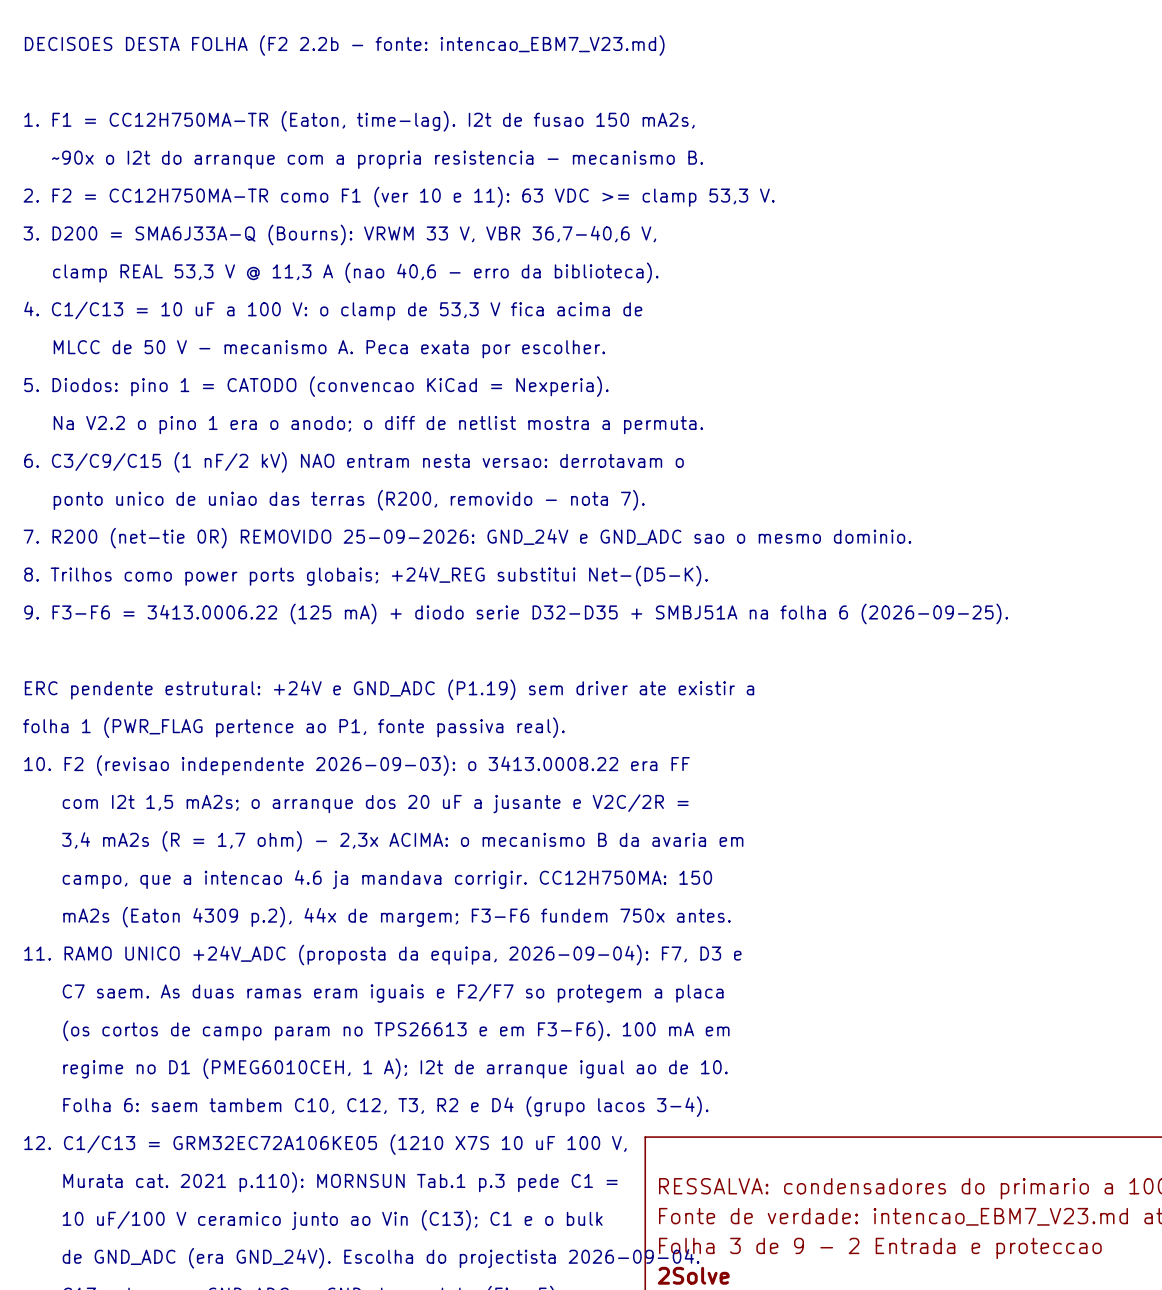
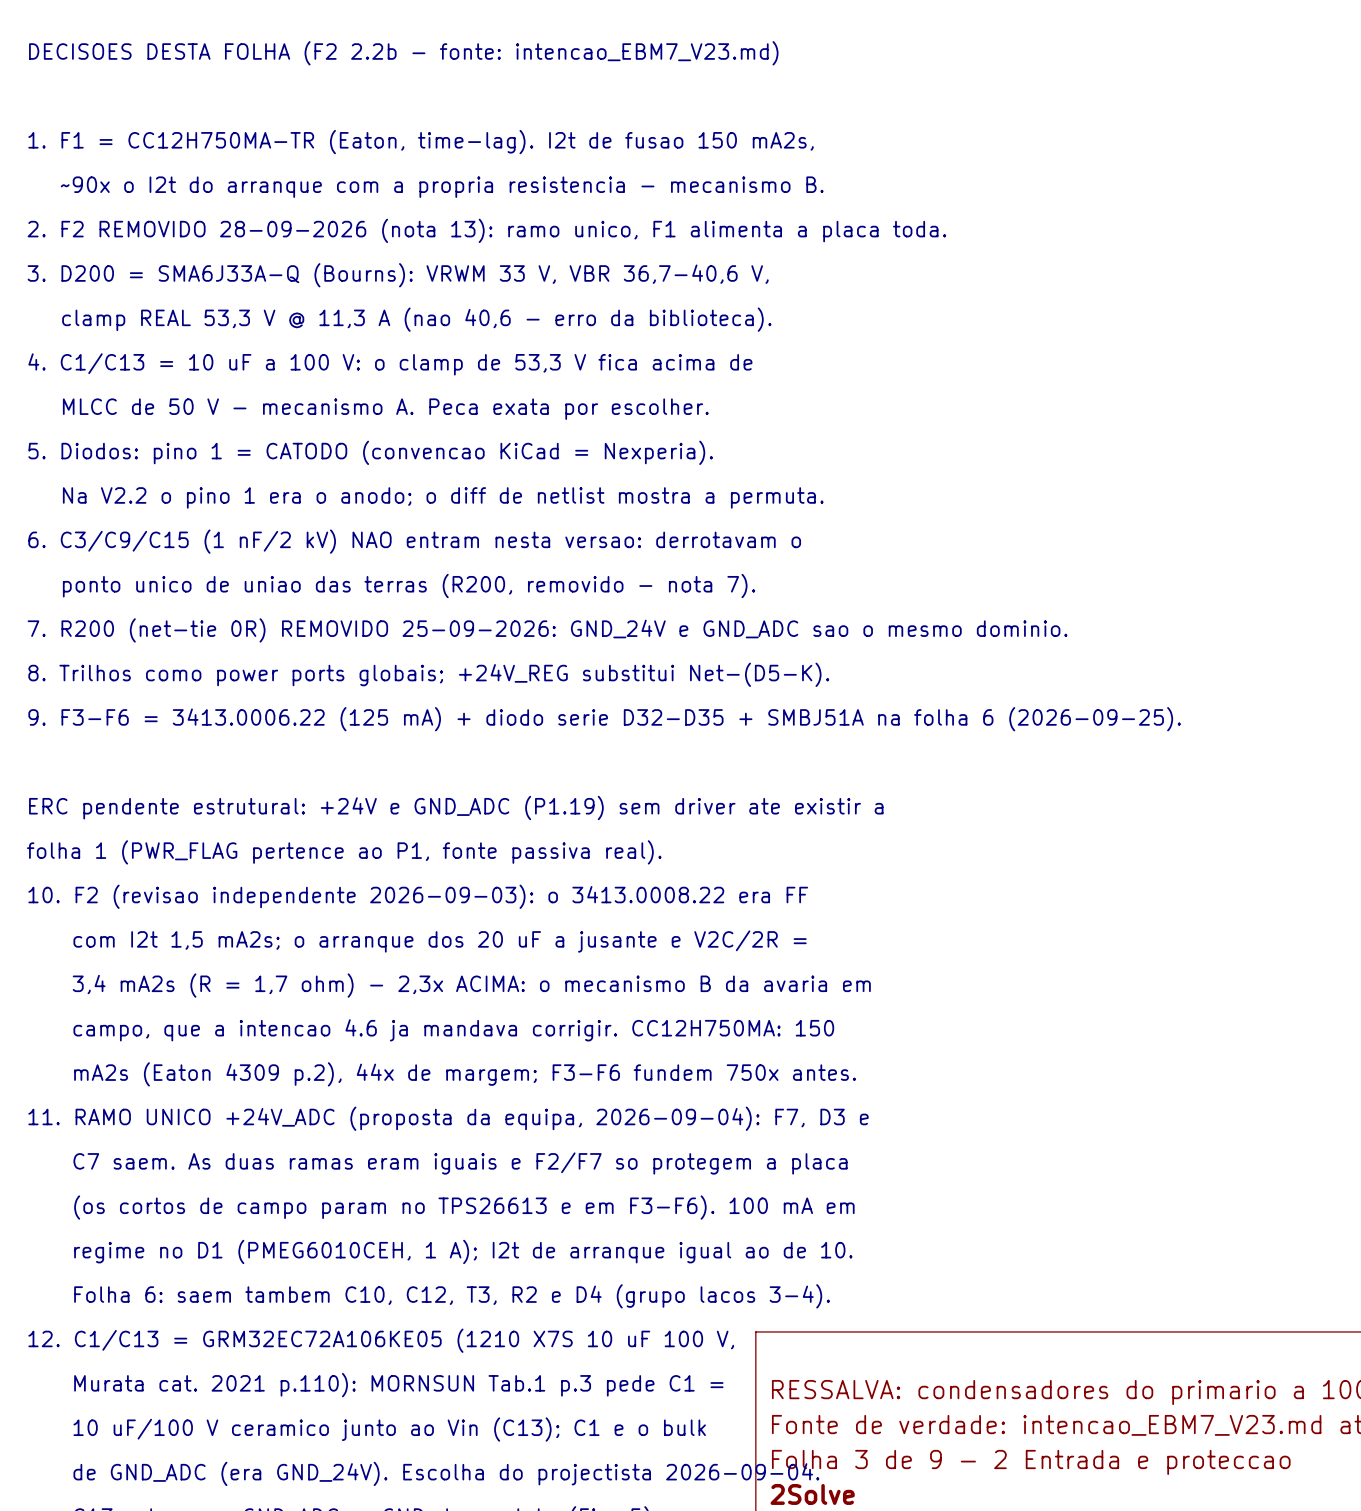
text: 2. F2 = CC12H750MA-TR como F1 (ver 10 e 11): 63 VDC >= clamp 53,3 V. (399, 197) -> 2. F2 REMOVIDO 28-09-2026 (nota 13): ramo unico, F1 alimenta a placa toda. (486, 230)

